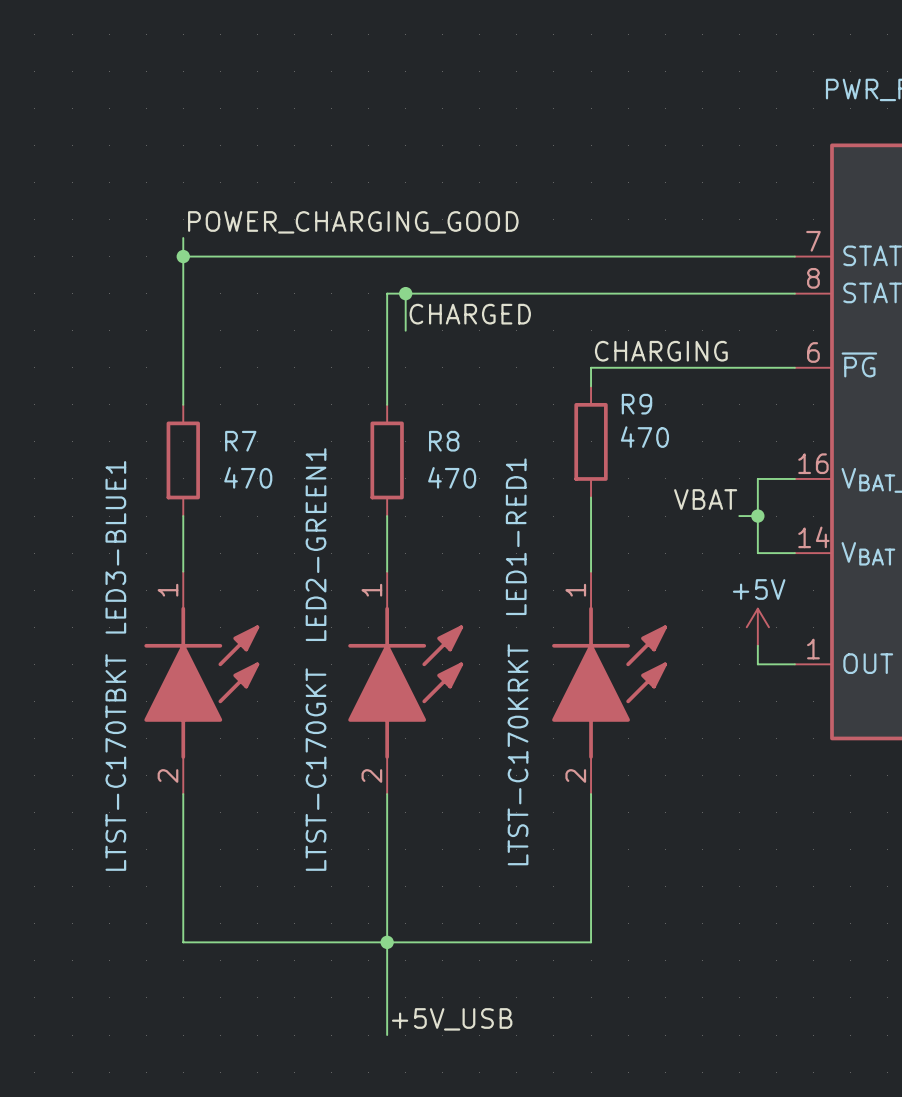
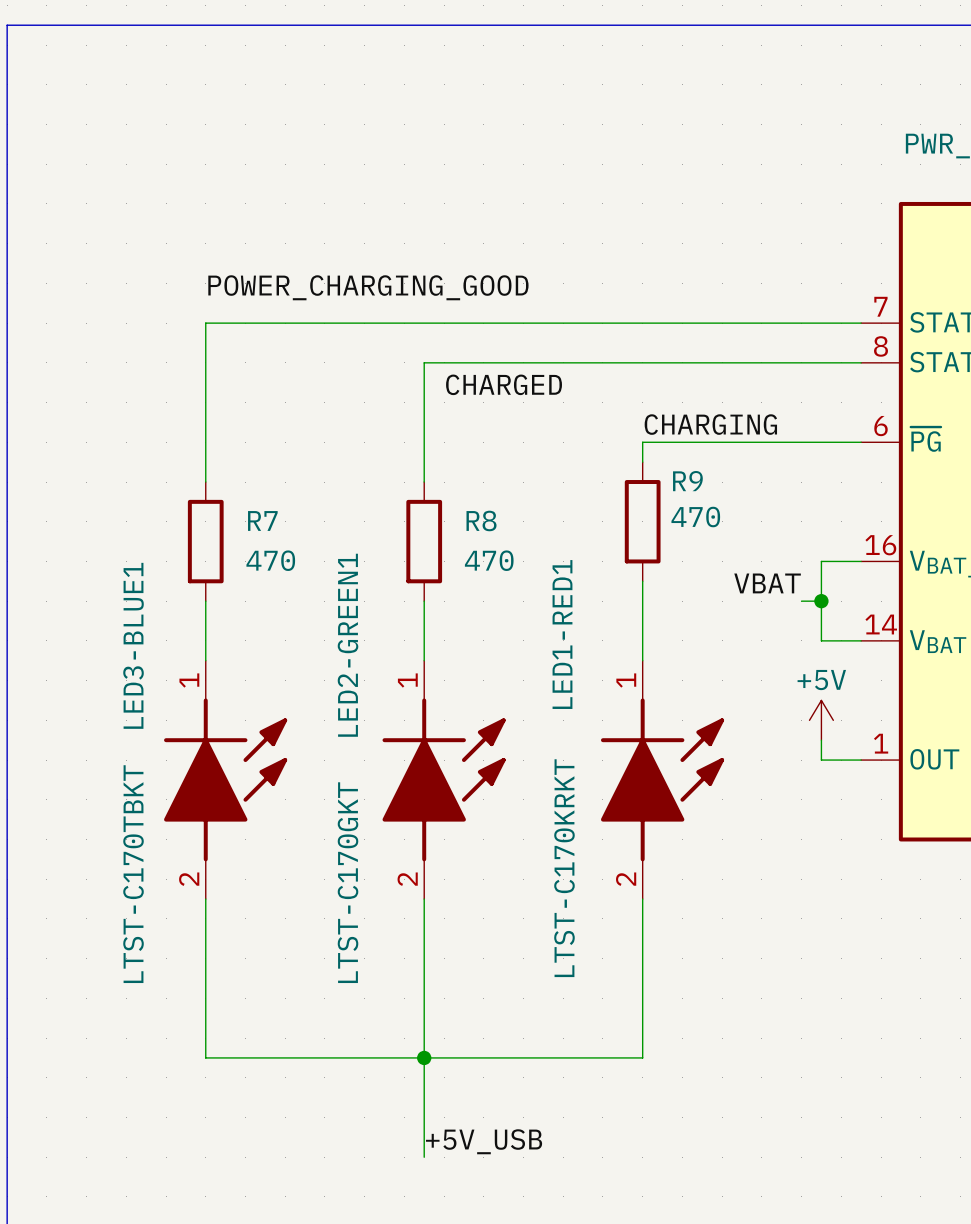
wire: (183, 238) (183, 256) -> none
junction: (183, 256) -> none
wire: (405, 293) (405, 330) -> none
junction: (405, 293) -> none

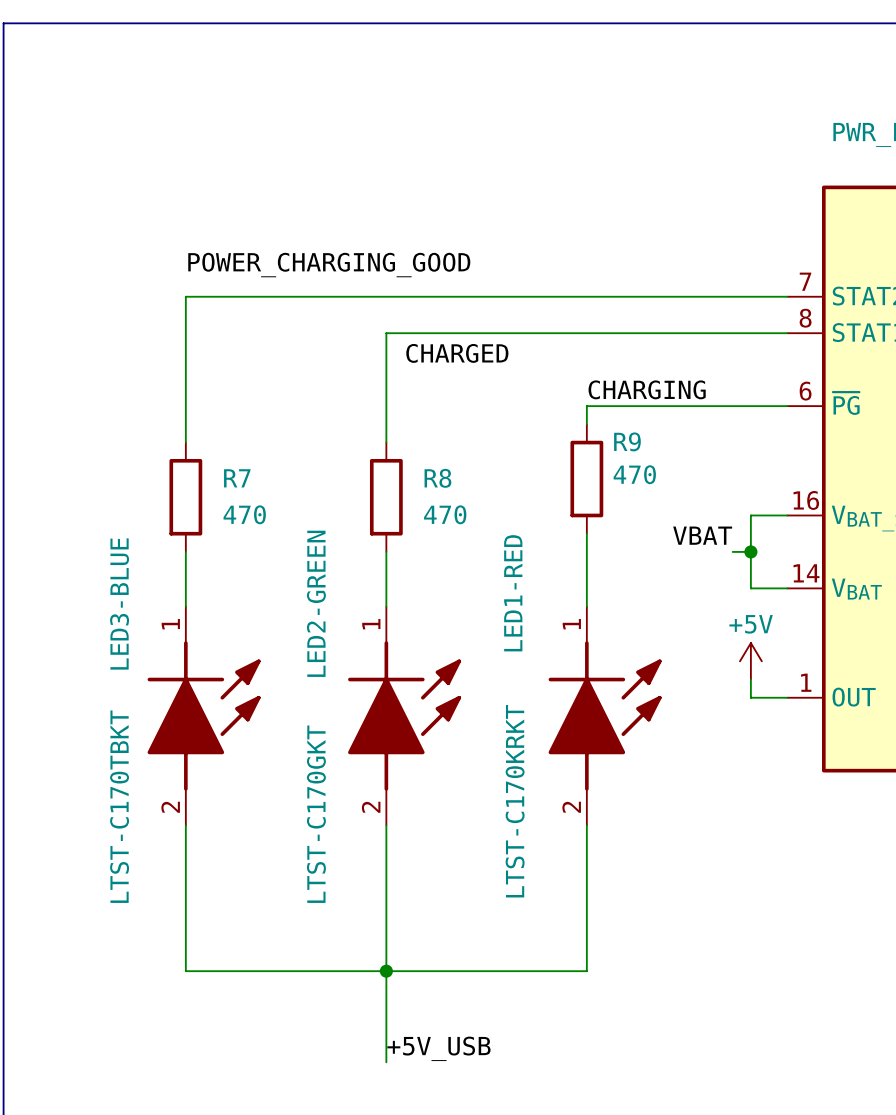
LED1-RED1 name: LED1-RED1 (562, 634) -> LED1-RED (513, 593)
LED3-BLUE1 name: LED3-BLUE1 (133, 645) -> LED3-BLUE (119, 603)
LED2-GREEN1 name: LED2-GREEN1 (348, 645) -> LED2-GREEN (316, 603)

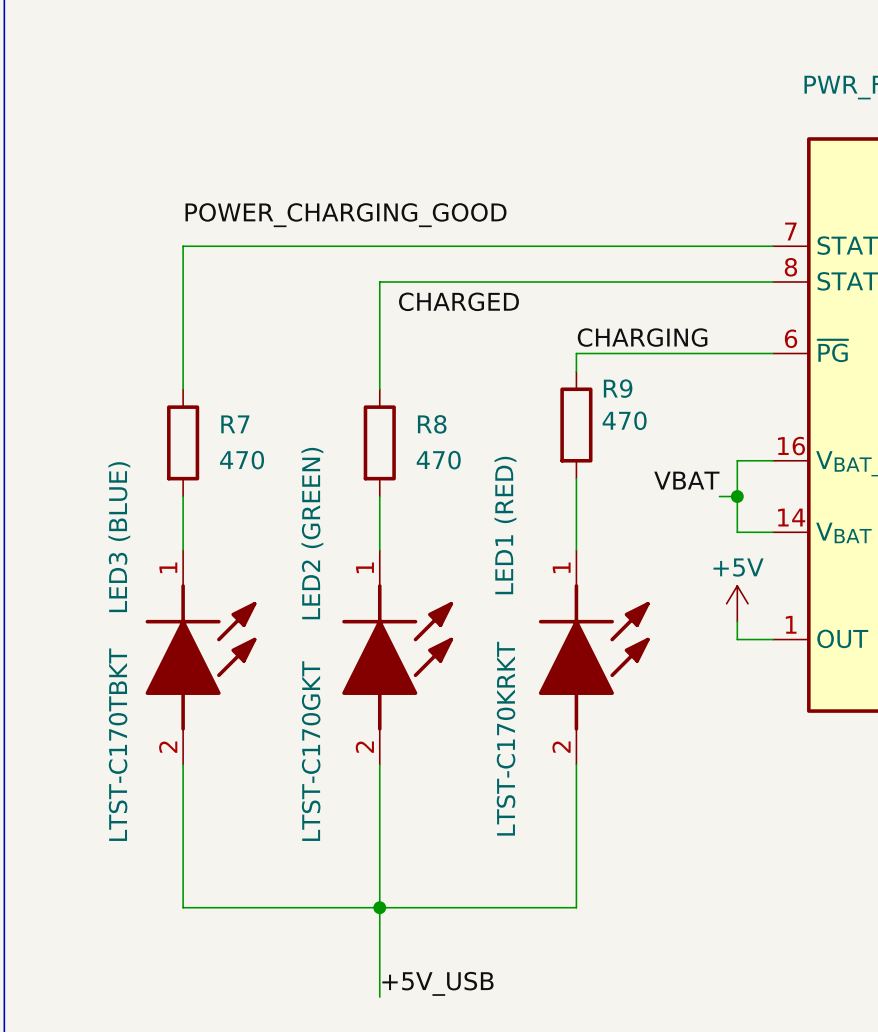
LED1-RED name: LED1-RED (513, 593) -> LED1 (RED) (505, 525)
LED3-BLUE name: LED3-BLUE (119, 603) -> LED3 (BLUE) (119, 537)
LED2-GREEN name: LED2-GREEN (316, 603) -> LED2 (GREEN) (312, 533)

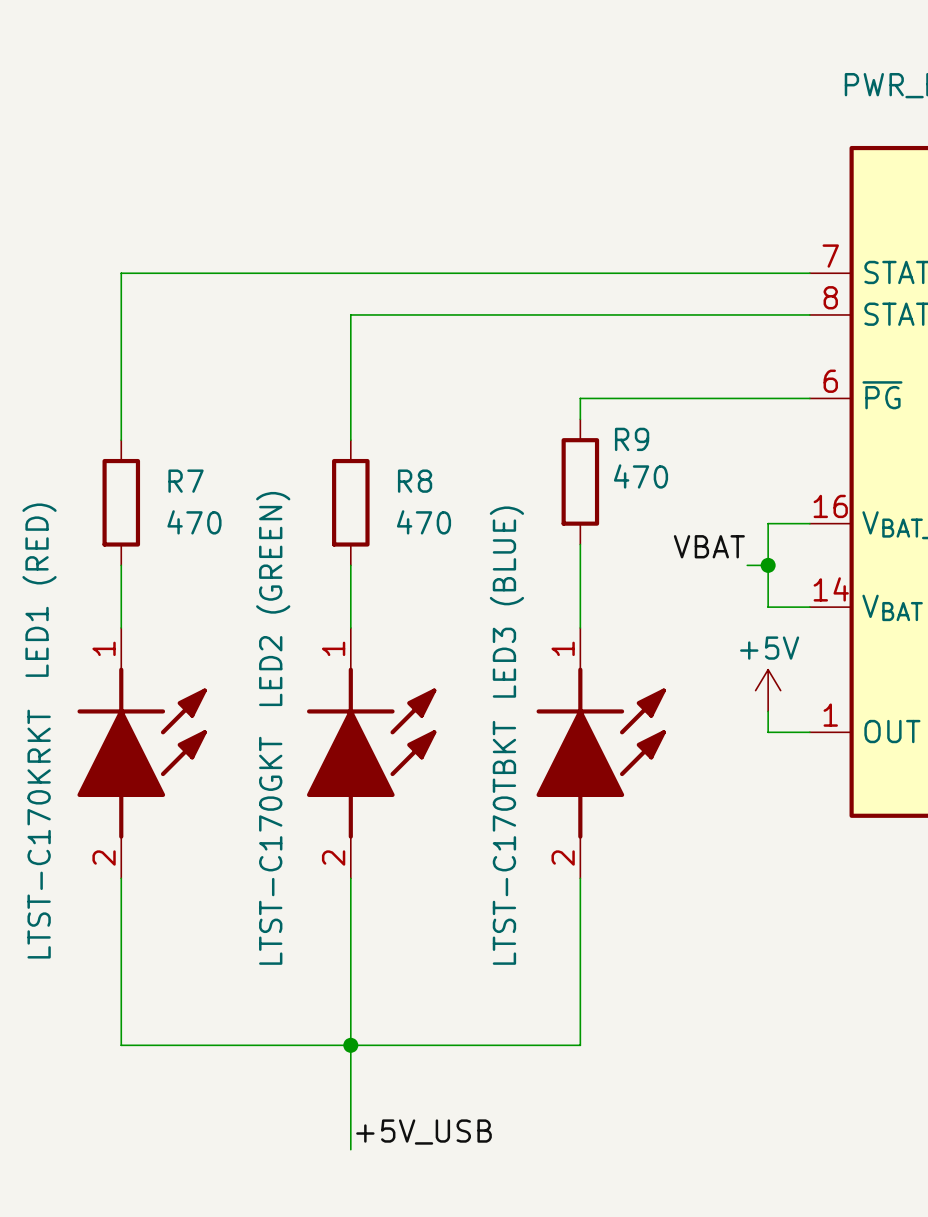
label: POWER_CHARGING_GOOD (346, 215) -> none
label: CHARGED (458, 301) -> none
label: CHARGING (642, 337) -> none
LED1 (RED) name: LED1 (RED) (505, 525) -> LED3 (BLUE) (506, 602)
LED3 (BLUE) name: LED3 (BLUE) (119, 537) -> LED1 (RED) (39, 590)
LED1 (RED) value: LTST-C170KRKT (506, 738) -> LTST-C170TBKT (504, 842)
LED3 (BLUE) value: LTST-C170TBKT (118, 744) -> LTST-C170KRKT (39, 834)

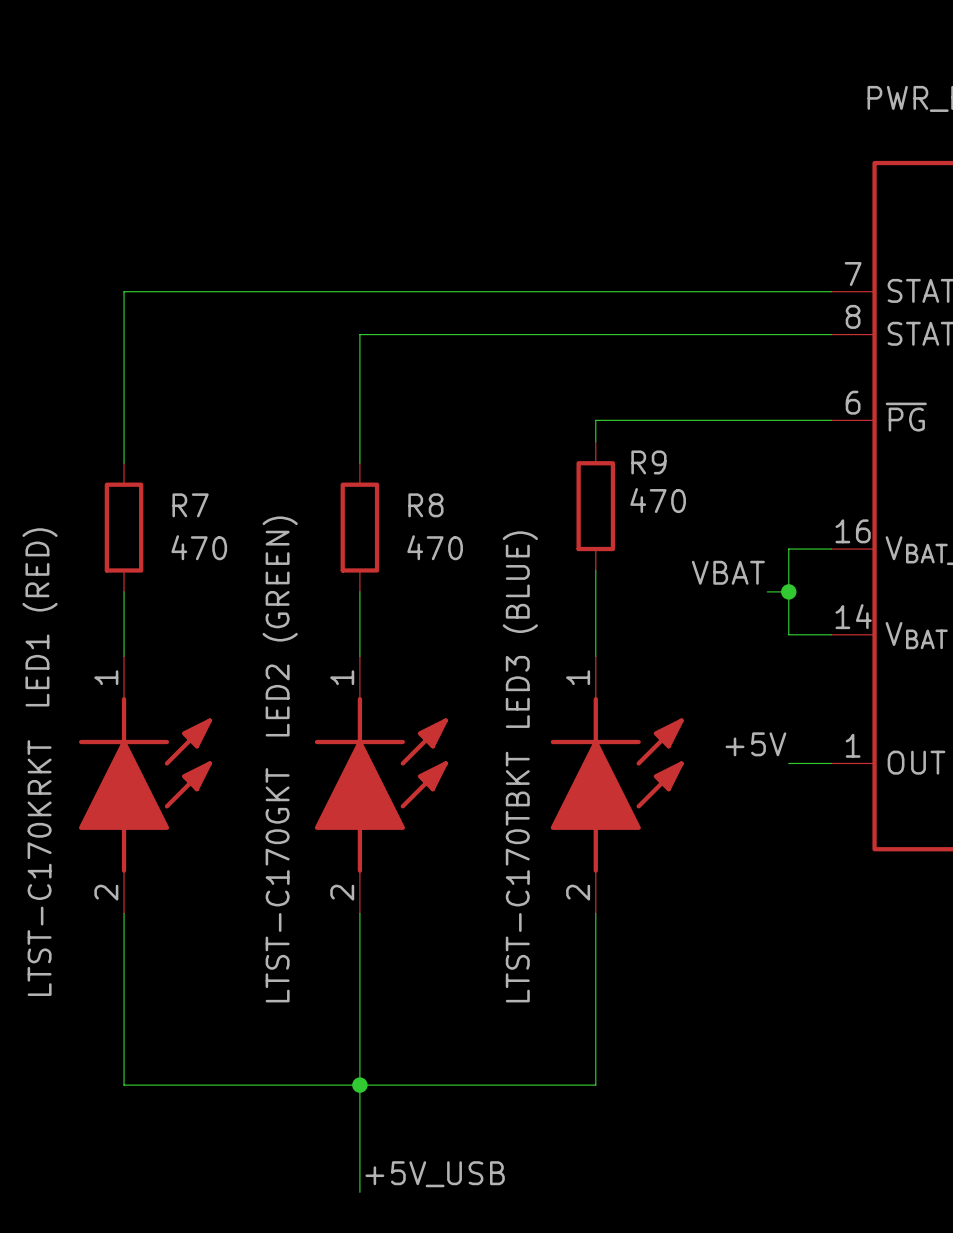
power symbol: +5V (768, 690) -> none
wire: (768, 711) (768, 732) -> none
label: none -> +5V (755, 744)

